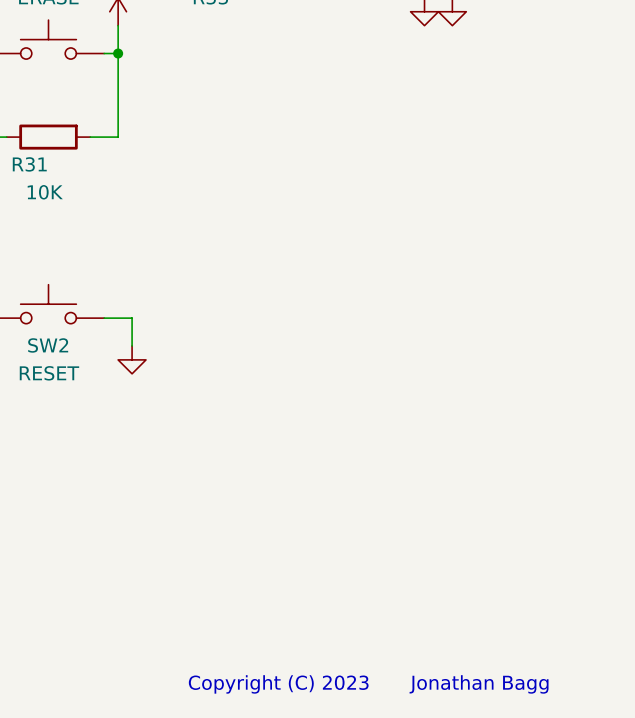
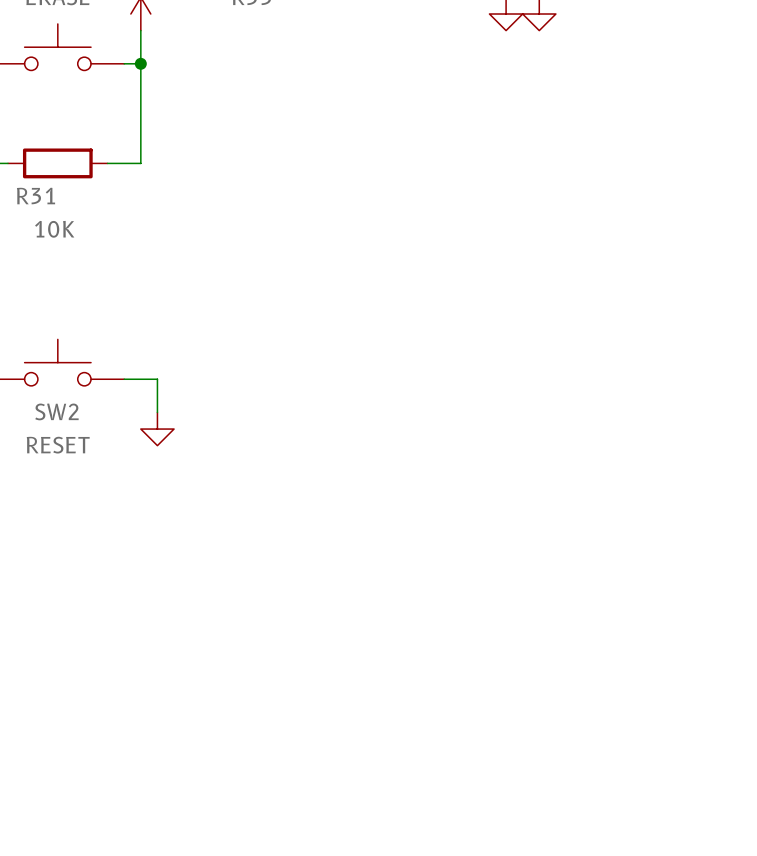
text: Copyright (C) 2023 (278, 684) -> none
text: Jonathan Bagg (479, 684) -> none

